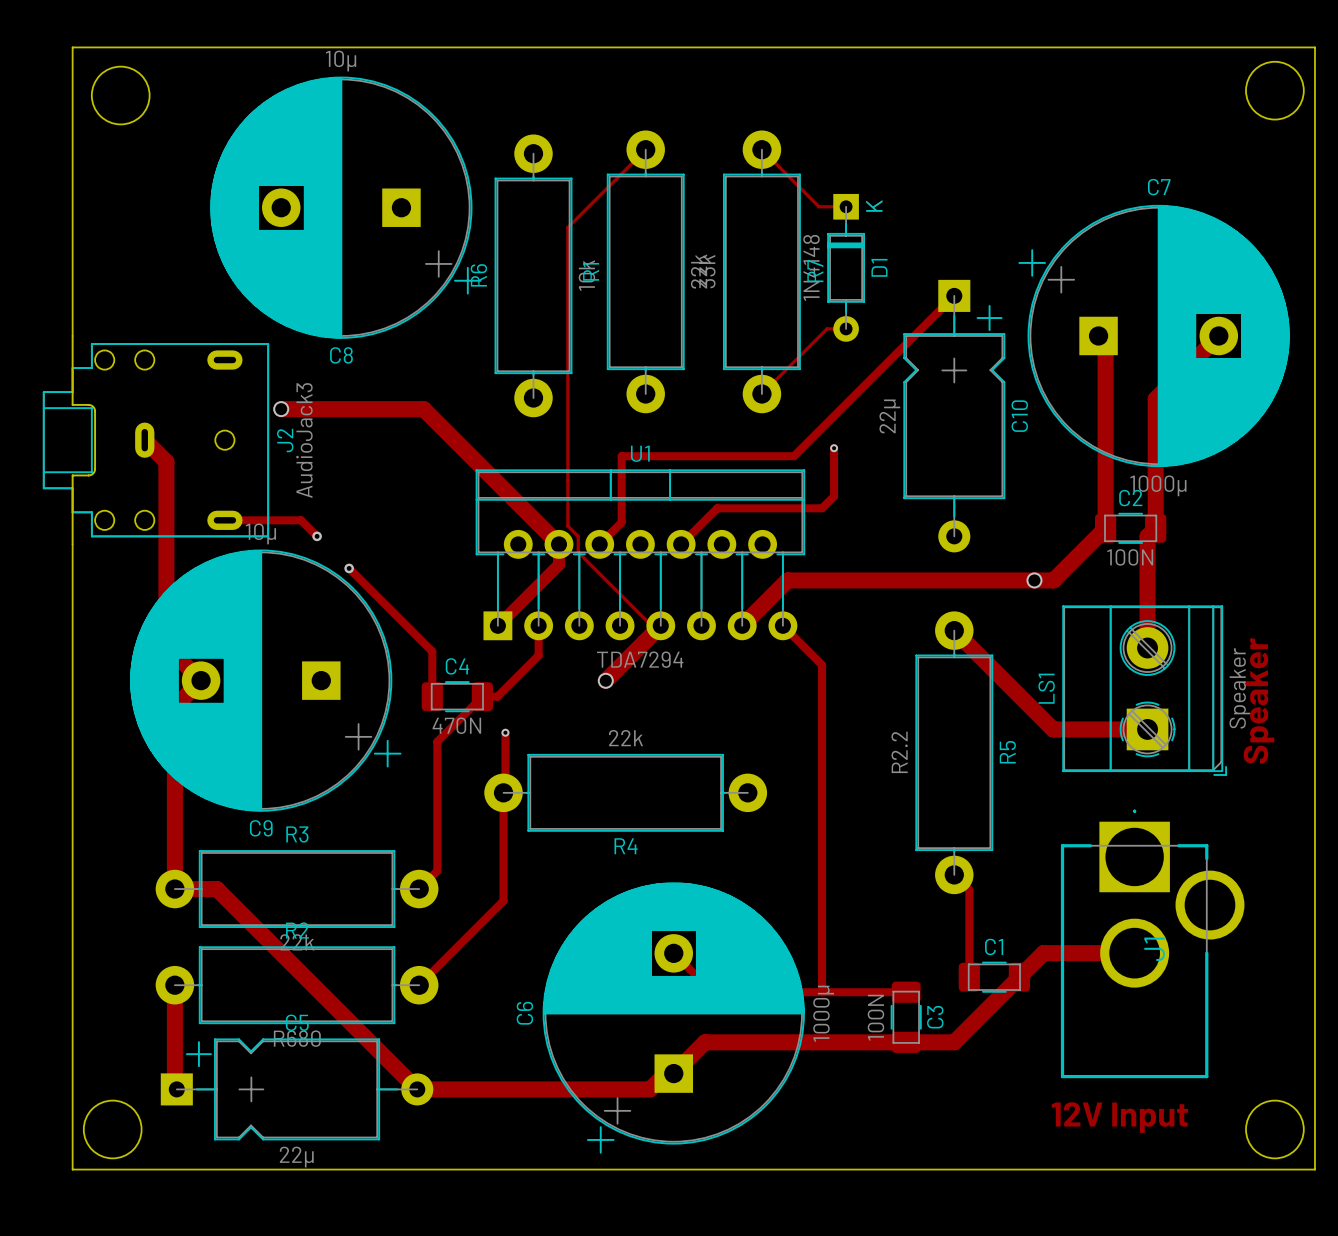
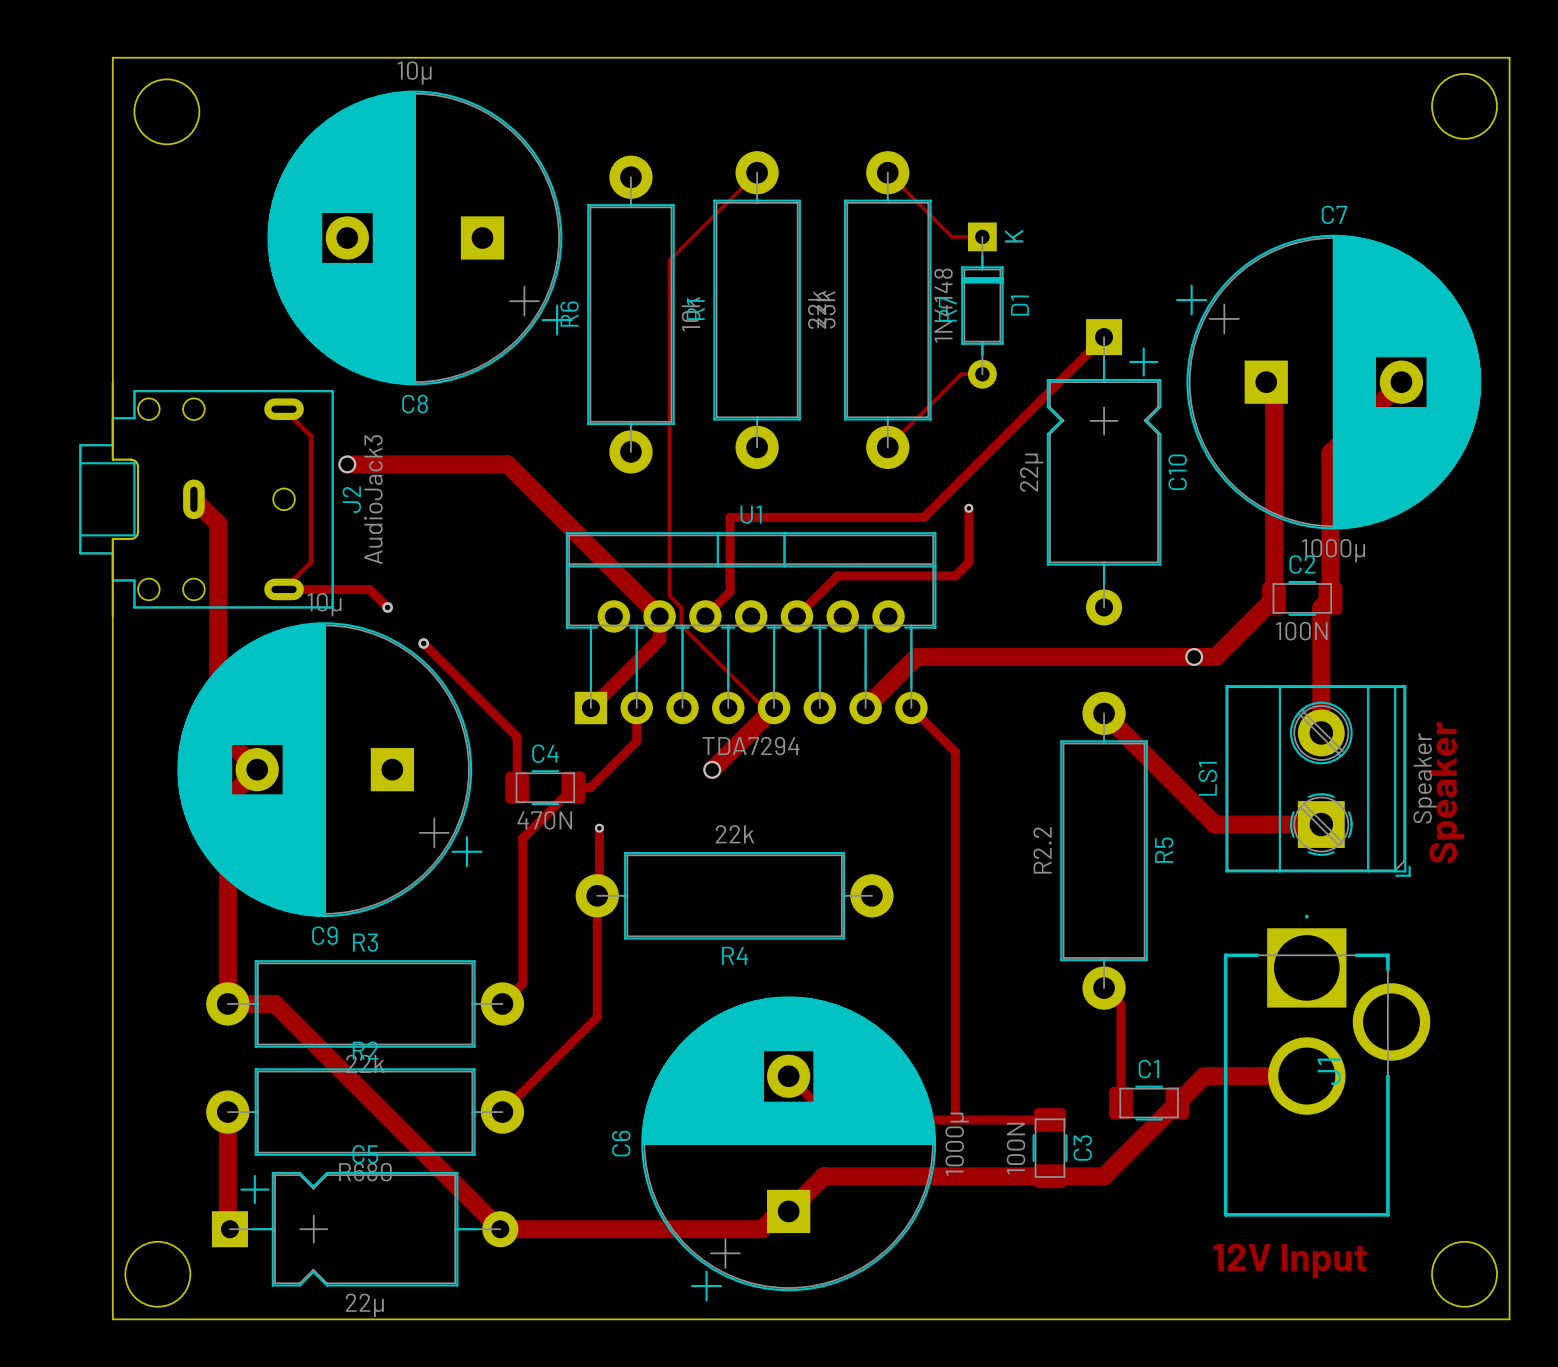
track: none -> (284, 409) (311, 436) (311, 562) (284, 589)

